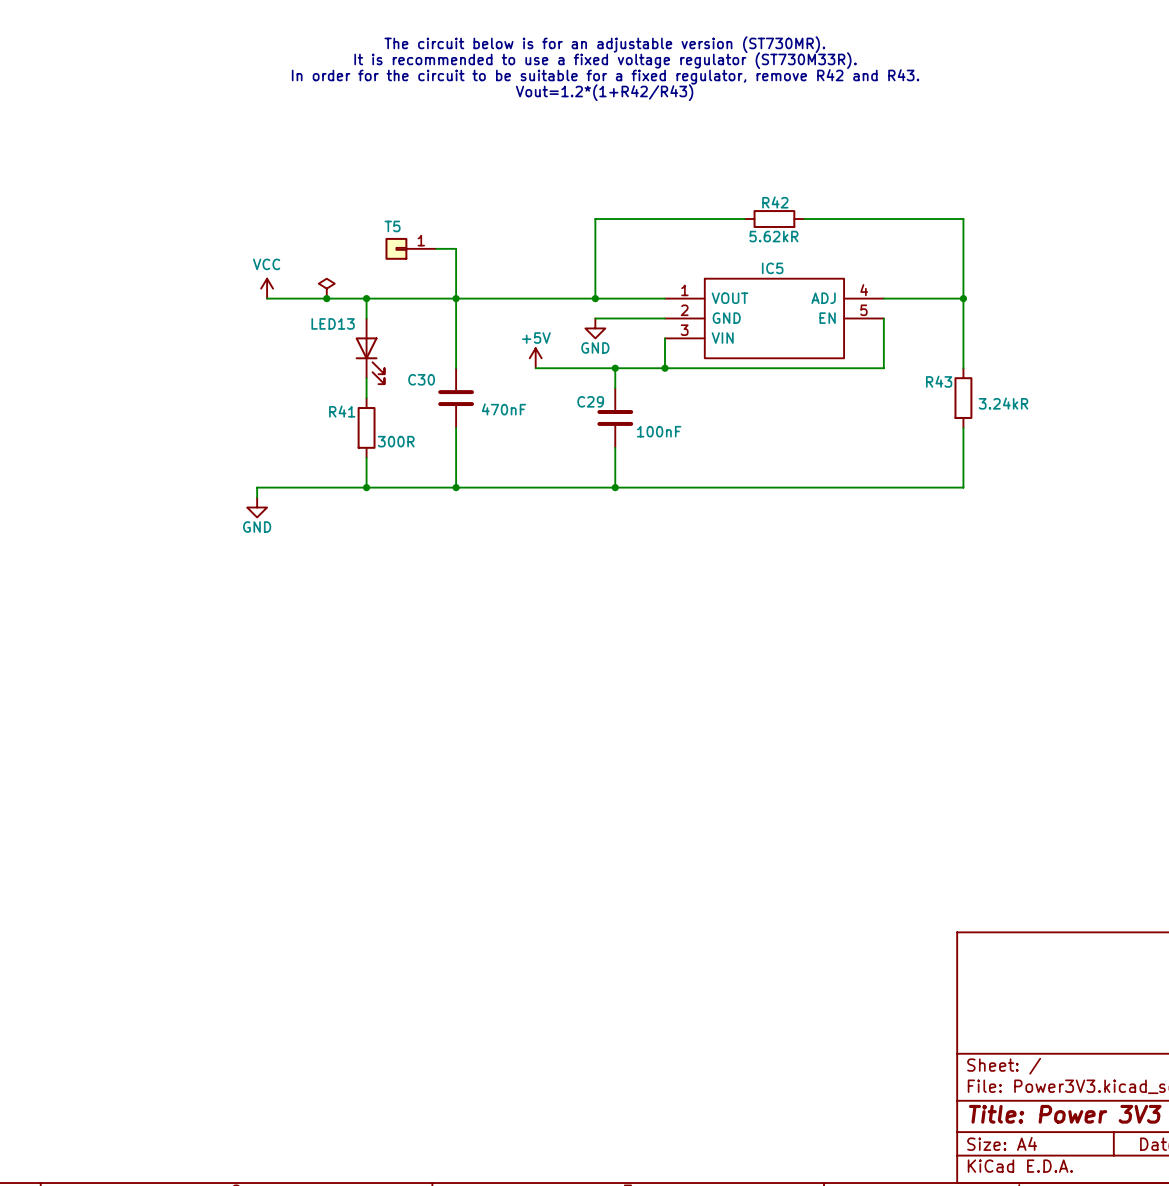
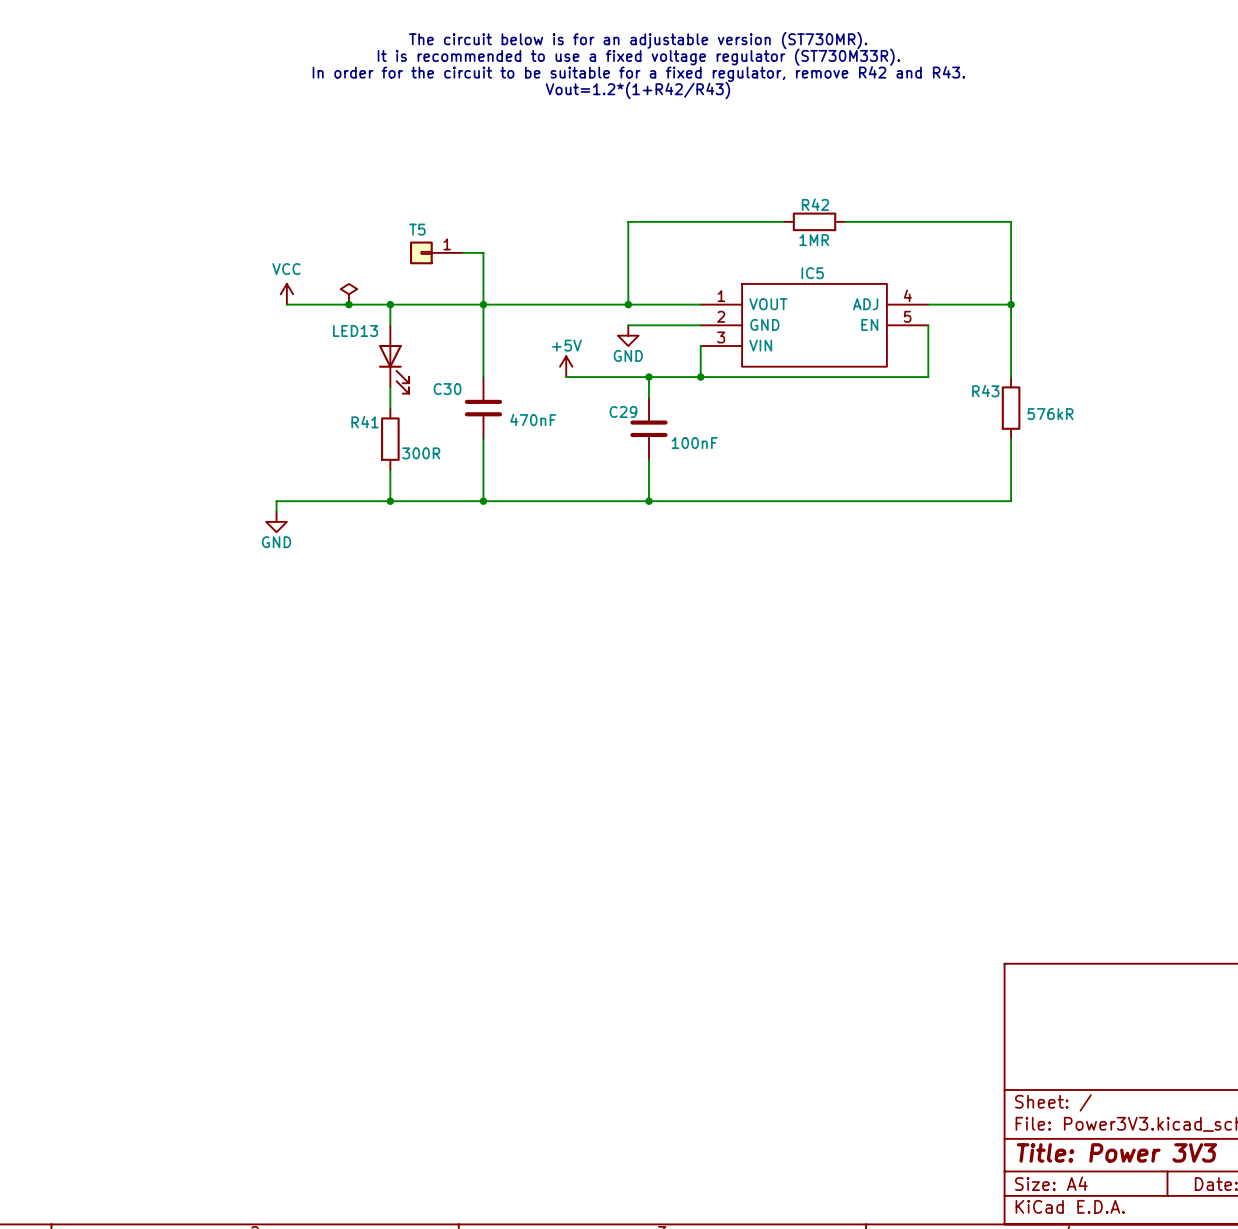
R42 value: 5.62kR (773, 236) -> 1MR (814, 240)
R43 value: 3.24kR (1003, 403) -> 576kR (1050, 414)

